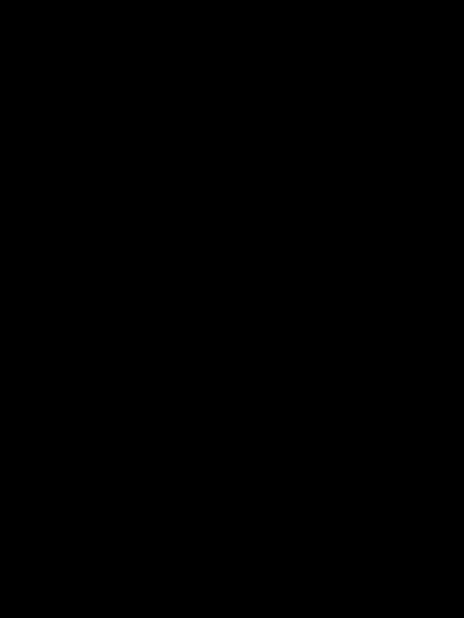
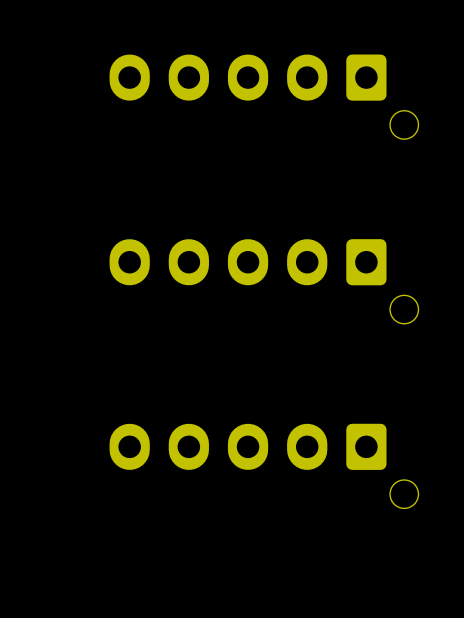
part: none -> (264, 96)
part: none -> (264, 281)
part: none -> (264, 466)

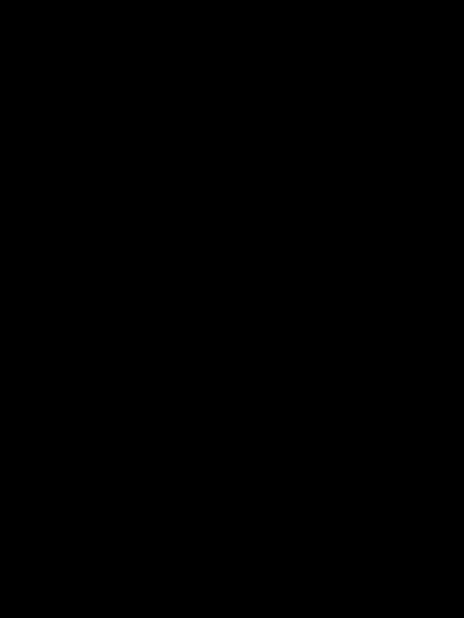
part: (264, 96) -> none
part: (264, 281) -> none
part: (264, 466) -> none

